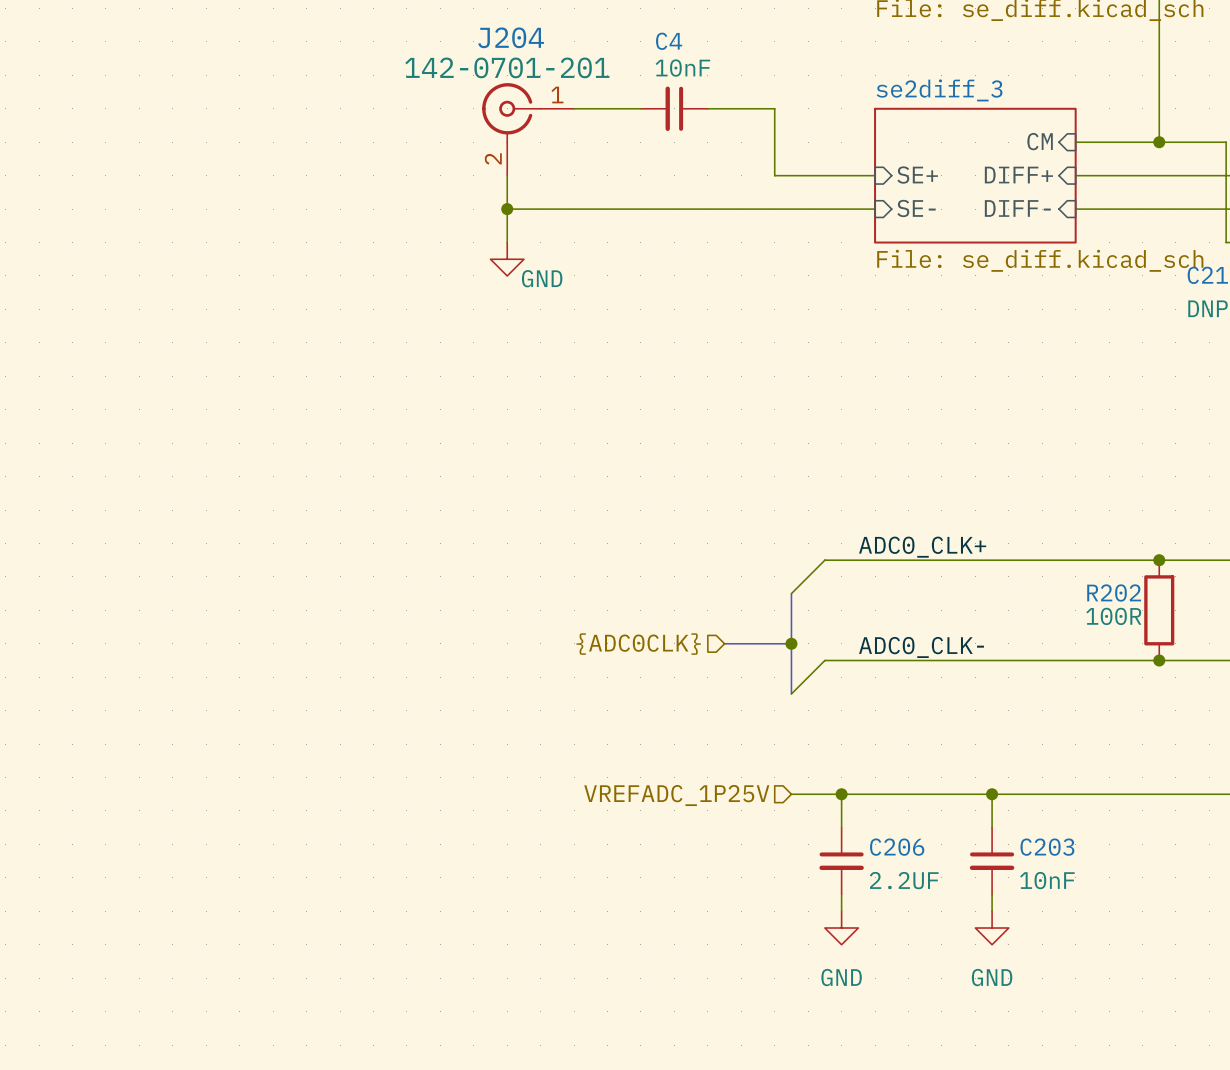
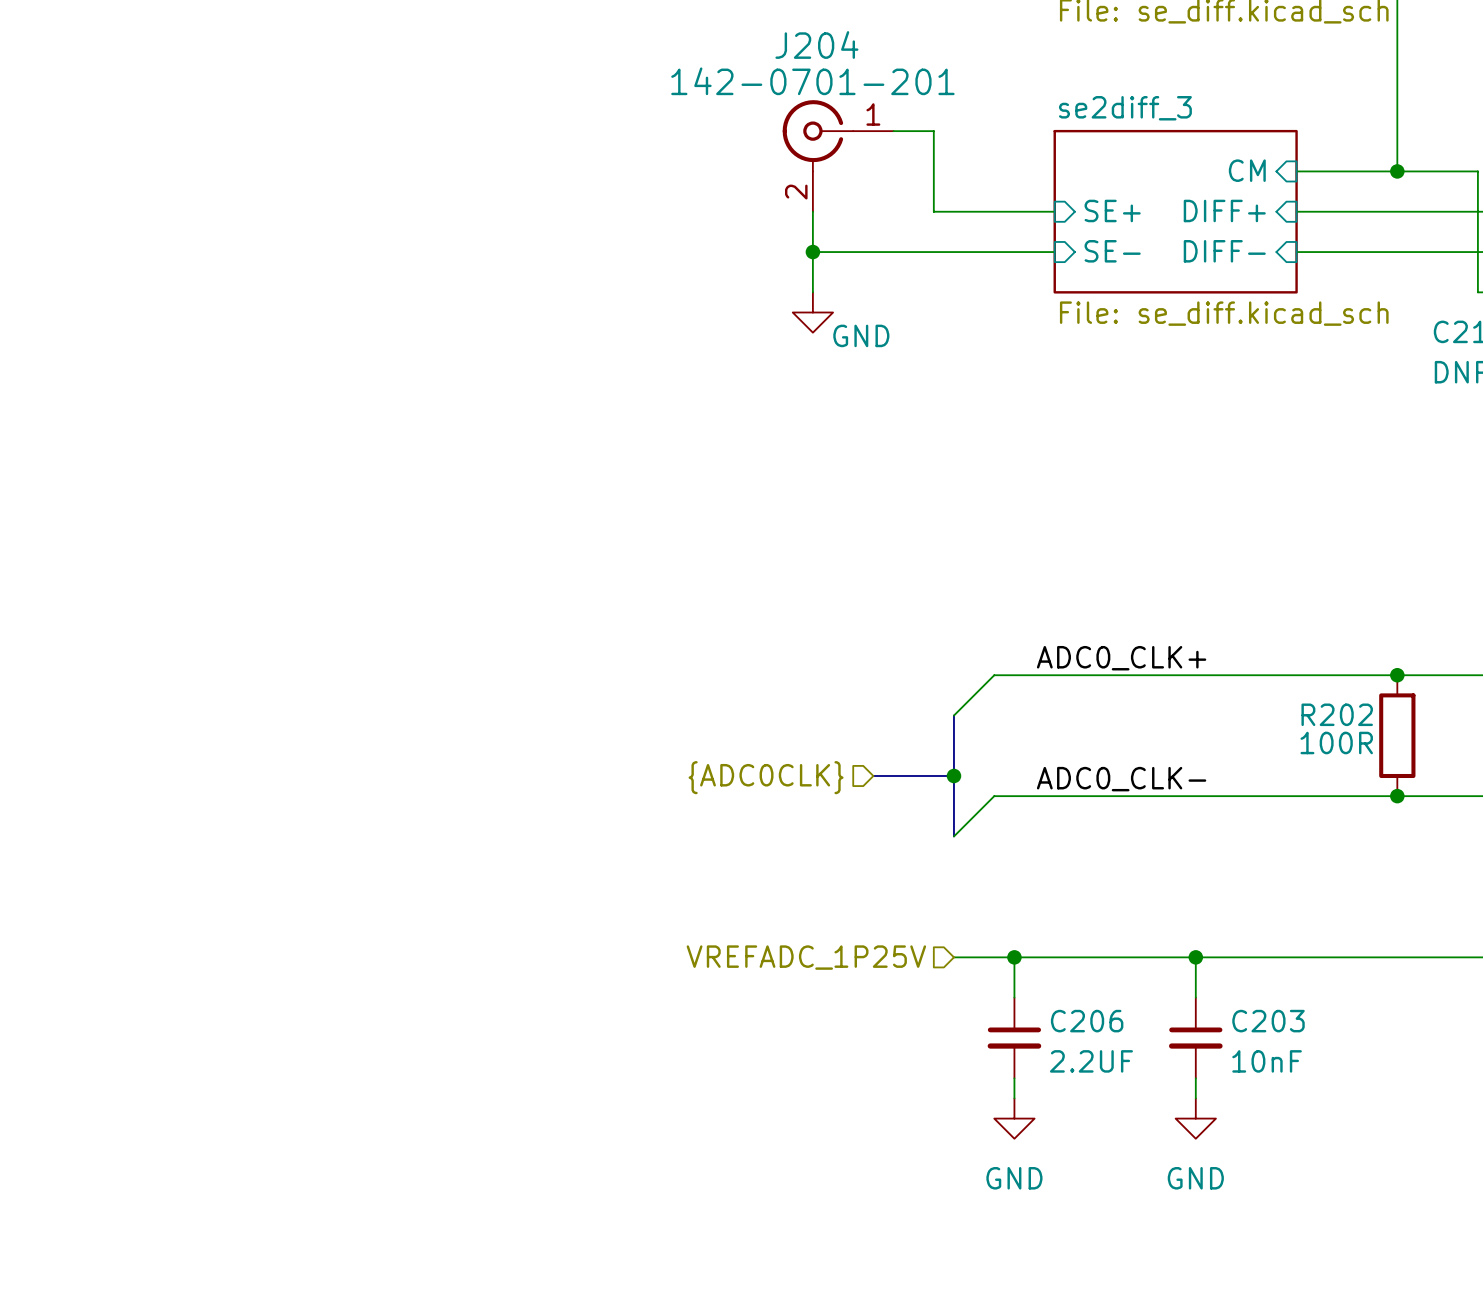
wire: (574, 108) (640, 108) -> none
C4: 10nF (674, 108) -> none
J204 position: (528, 129) -> (838, 155)
wire: (507, 175) (507, 242) -> (812, 211) (812, 292)
wire: (507, 209) (674, 209) -> none
junction: (507, 209) -> none
junction: none -> (812, 252)
power symbol position: GND (507, 259) -> GND (812, 312)

